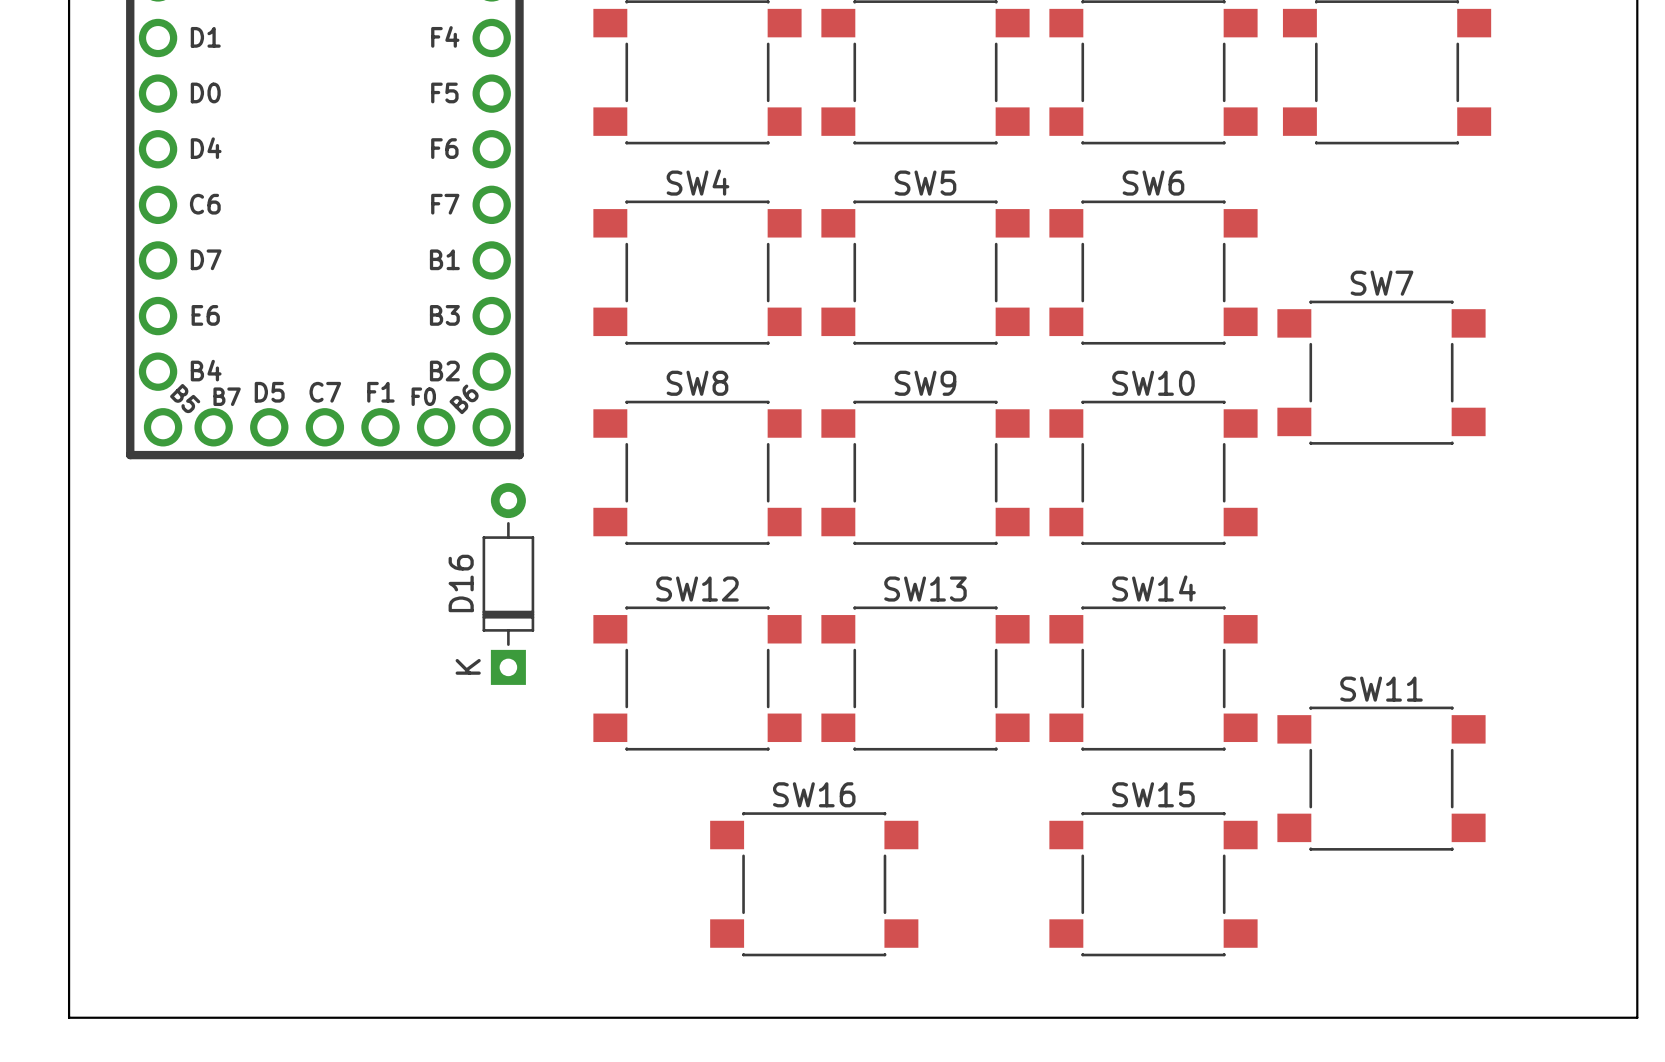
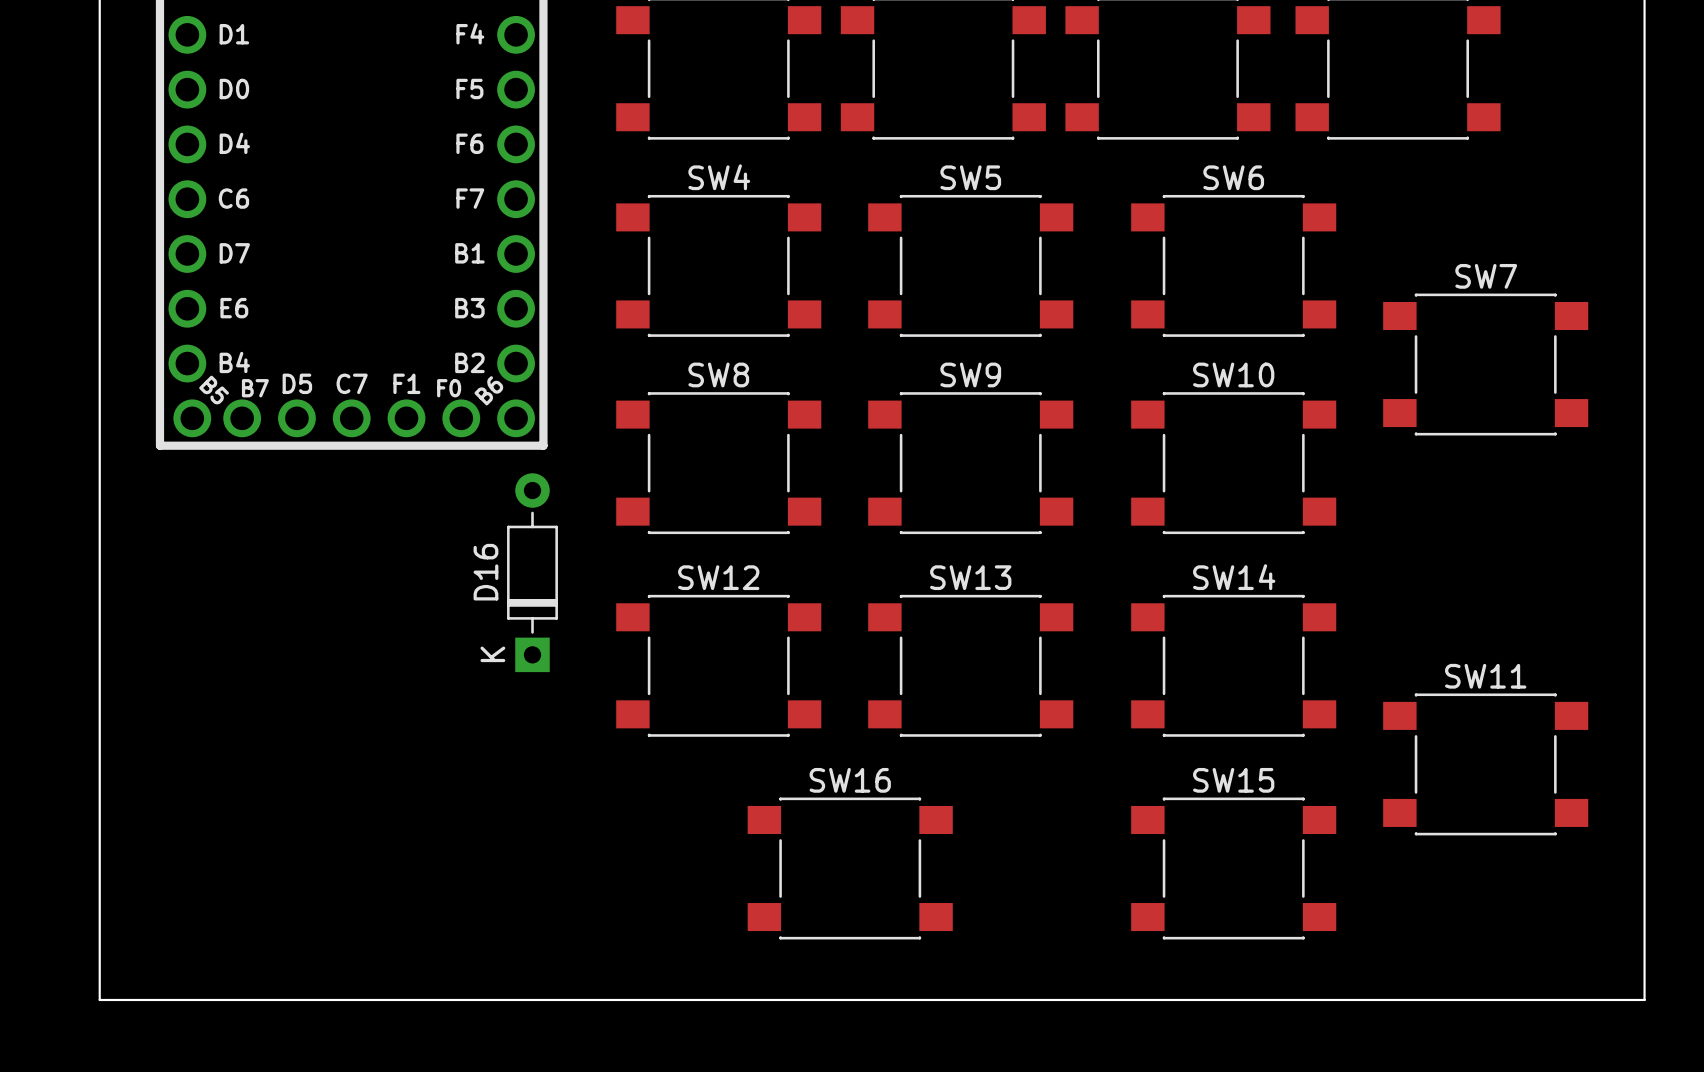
SW5 position: (925, 272) -> (970, 265)
SW6 position: (1153, 272) -> (1233, 265)
SW7 position: (1381, 372) -> (1485, 364)
SW9 position: (925, 472) -> (970, 463)
SW10 position: (1153, 472) -> (1233, 463)
SW13 position: (925, 678) -> (970, 665)
SW14 position: (1153, 678) -> (1233, 665)
SW11 position: (1381, 778) -> (1485, 764)
SW16 position: (814, 884) -> (850, 868)
SW15 position: (1153, 884) -> (1233, 868)

